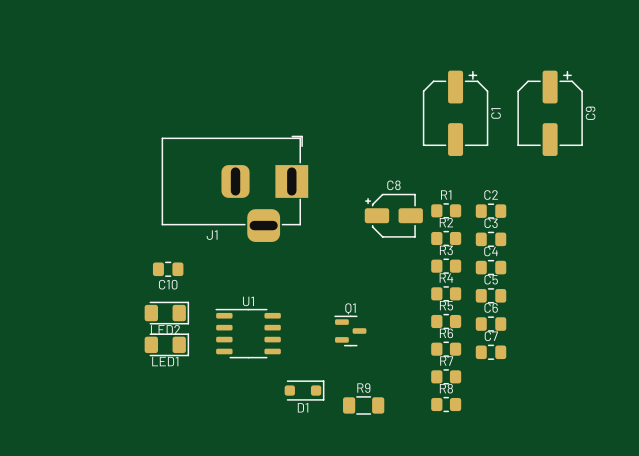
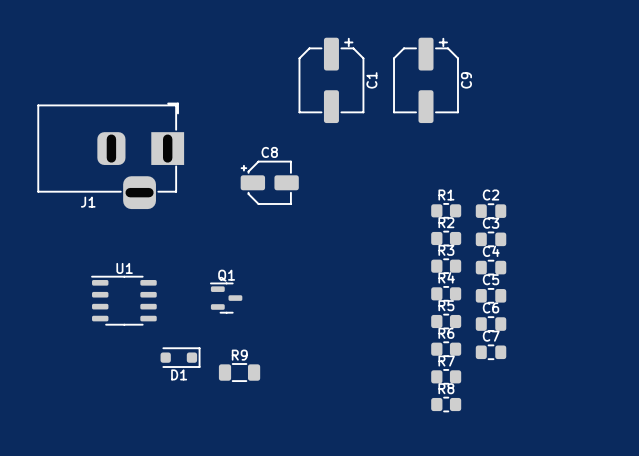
C1 position: (455, 113) -> (331, 80)
C9 position: (550, 113) -> (426, 80)
J1 position: (235, 188) -> (110, 156)
C8 position: (393, 215) -> (269, 182)
C10: (168, 269) -> none
LED2: (166, 313) -> none
Q1 position: (350, 330) -> (226, 298)
U1 position: (248, 333) -> (124, 300)
LED1: (166, 344) -> none
D1 position: (304, 390) -> (180, 357)
R9 position: (363, 405) -> (239, 372)

